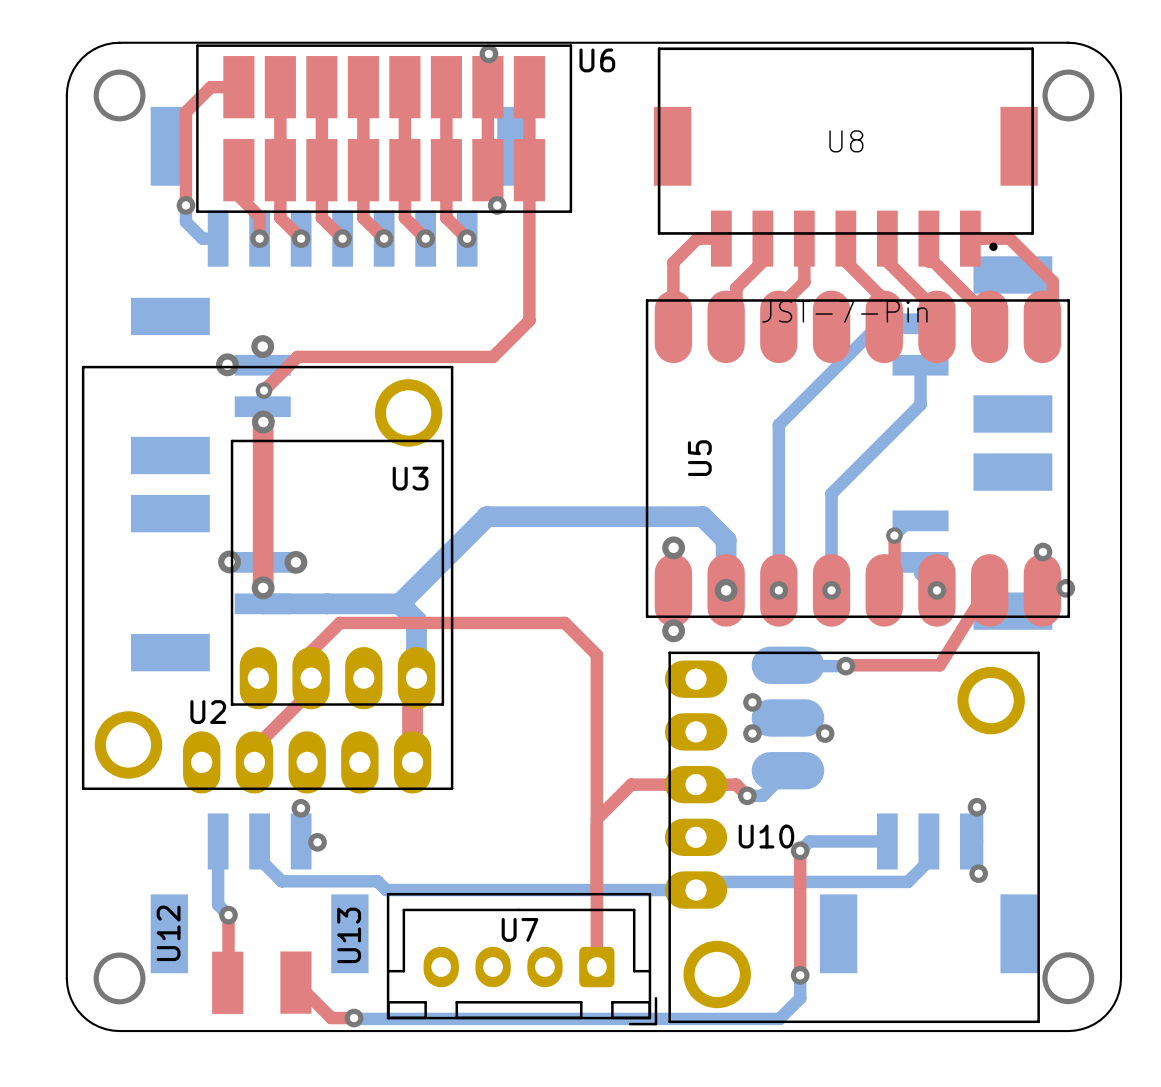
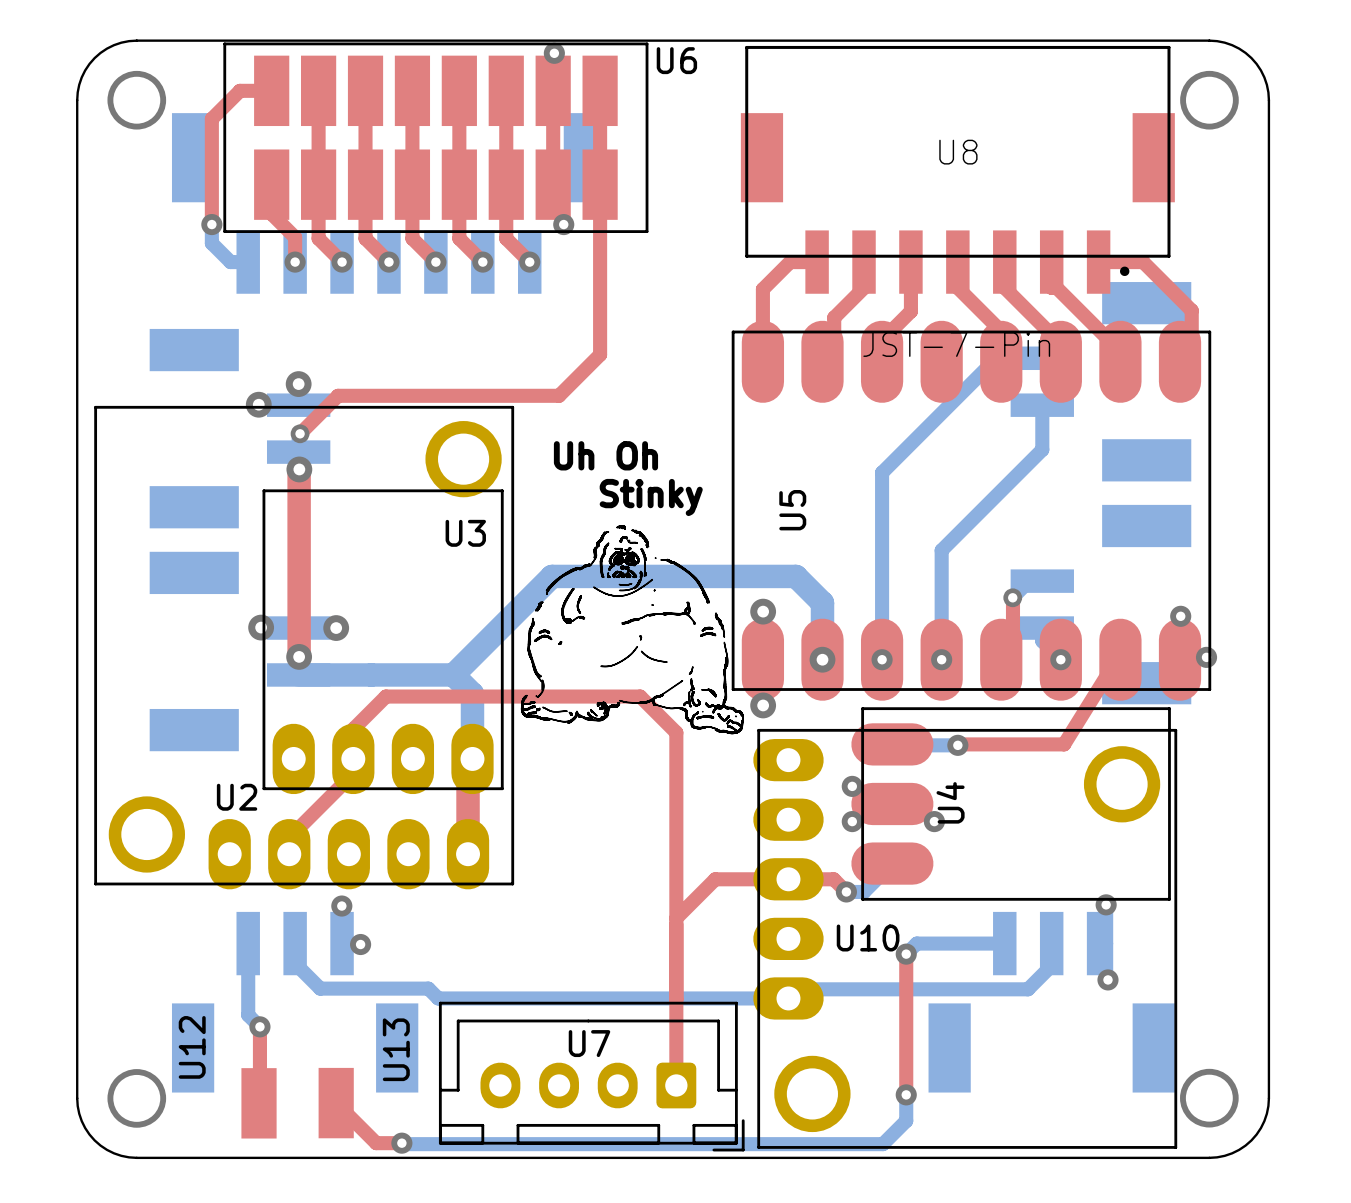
text: none -> Uh Oh (605, 455)
text: none -> Stinky (651, 497)
line: none -> (620, 527) (621, 527)
line: none -> (640, 532) (647, 540)
line: none -> (630, 542) (635, 542)
line: none -> (597, 542) (597, 545)
line: none -> (597, 547) (596, 548)
line: none -> (615, 548) (620, 548)
line: none -> (625, 549) (627, 549)
line: none -> (627, 550) (628, 550)
line: none -> (594, 550) (594, 555)
line: none -> (643, 554) (644, 576)
line: none -> (617, 556) (620, 556)
line: none -> (595, 557) (590, 564)
line: none -> (616, 558) (616, 558)
line: none -> (620, 558) (621, 558)
line: none -> (622, 559) (622, 561)
line: none -> (627, 558) (627, 560)
line: none -> (600, 562) (601, 575)
line: none -> (627, 561) (631, 561)
line: none -> (673, 561) (695, 578) (708, 599)
line: none -> (601, 562) (602, 575)
line: none -> (673, 563) (691, 575) (702, 590)
line: none -> (577, 567) (561, 575) (549, 586)
line: none -> (575, 570) (567, 573)
line: none -> (622, 574) (626, 574)
line: none -> (641, 575) (639, 583) (634, 588)
line: none -> (561, 577) (550, 587)
line: none -> (639, 579) (633, 588) (619, 590)
line: none -> (652, 579) (648, 582)
line: none -> (648, 582) (632, 592) (620, 596) (607, 594) (593, 587)
line: none -> (631, 583) (619, 584)
line: none -> (573, 589) (563, 606) (563, 617)
line: none -> (572, 589) (562, 609)
line: none -> (581, 596) (578, 604)
line: none -> (539, 604) (539, 605)
line: none -> (662, 613) (648, 614) (632, 619)
line: none -> (666, 613) (680, 613)
line: none -> (671, 613) (678, 614)
line: none -> (682, 613) (682, 613)
line: none -> (683, 614) (687, 614)
line: none -> (688, 615) (694, 623)
line: none -> (581, 616) (572, 621)
line: none -> (565, 618) (569, 618)
line: none -> (722, 625) (724, 637)
line: none -> (532, 626) (530, 642)
line: none -> (706, 628) (712, 628)
line: none -> (529, 629) (528, 649)
line: none -> (707, 633) (702, 635)
line: none -> (708, 633) (714, 635)
line: none -> (543, 636) (535, 640)
line: none -> (724, 642) (727, 665)
line: none -> (637, 646) (630, 655) (618, 662) (609, 666) (601, 666)
line: none -> (529, 649) (536, 671)
line: none -> (641, 651) (651, 658) (666, 662)
line: none -> (726, 657) (726, 664)
line: none -> (531, 659) (535, 672) (541, 681)
line: none -> (725, 664) (725, 667)
line: none -> (692, 666) (691, 673)
line: none -> (725, 671) (726, 697)
line: none -> (724, 677) (724, 687)
line: none -> (542, 680) (543, 690)
line: none -> (682, 680) (662, 694)
line: none -> (542, 682) (542, 690)
line: none -> (702, 689) (708, 689)
line: none -> (709, 690) (715, 696)
line: none -> (542, 691) (538, 696)
line: none -> (689, 691) (688, 699)
line: none -> (693, 691) (693, 692)
line: none -> (691, 695) (693, 704)
line: none -> (651, 700) (639, 703) (619, 700)
line: none -> (686, 702) (687, 702)
line: none -> (523, 703) (529, 703)
line: none -> (655, 704) (669, 708) (680, 707)
line: none -> (612, 706) (617, 706)
line: none -> (542, 707) (552, 711) (567, 711)
line: none -> (607, 707) (606, 714)
line: none -> (724, 706) (724, 707)
line: none -> (600, 708) (600, 708)
line: none -> (608, 708) (607, 714)
line: none -> (592, 711) (597, 715)
line: none -> (534, 712) (530, 712)
line: none -> (718, 714) (719, 714)
line: none -> (527, 714) (527, 715)
line: none -> (575, 715) (571, 719)
line: none -> (527, 716) (544, 719)
line: none -> (590, 715) (597, 718)
line: none -> (704, 716) (712, 717)
line: none -> (743, 716) (742, 727)
line: none -> (585, 717) (591, 718)
line: none -> (606, 717) (603, 719)
line: none -> (548, 718) (568, 721)
line: none -> (599, 719) (601, 719)
line: none -> (587, 719) (596, 720)
line: none -> (692, 719) (692, 724)
line: none -> (706, 726) (702, 727)
line: none -> (707, 726) (714, 728)
line: none -> (727, 726) (727, 727)
line: none -> (731, 726) (736, 730)
U4 side: bottom (787, 718) -> top (1011, 803)

